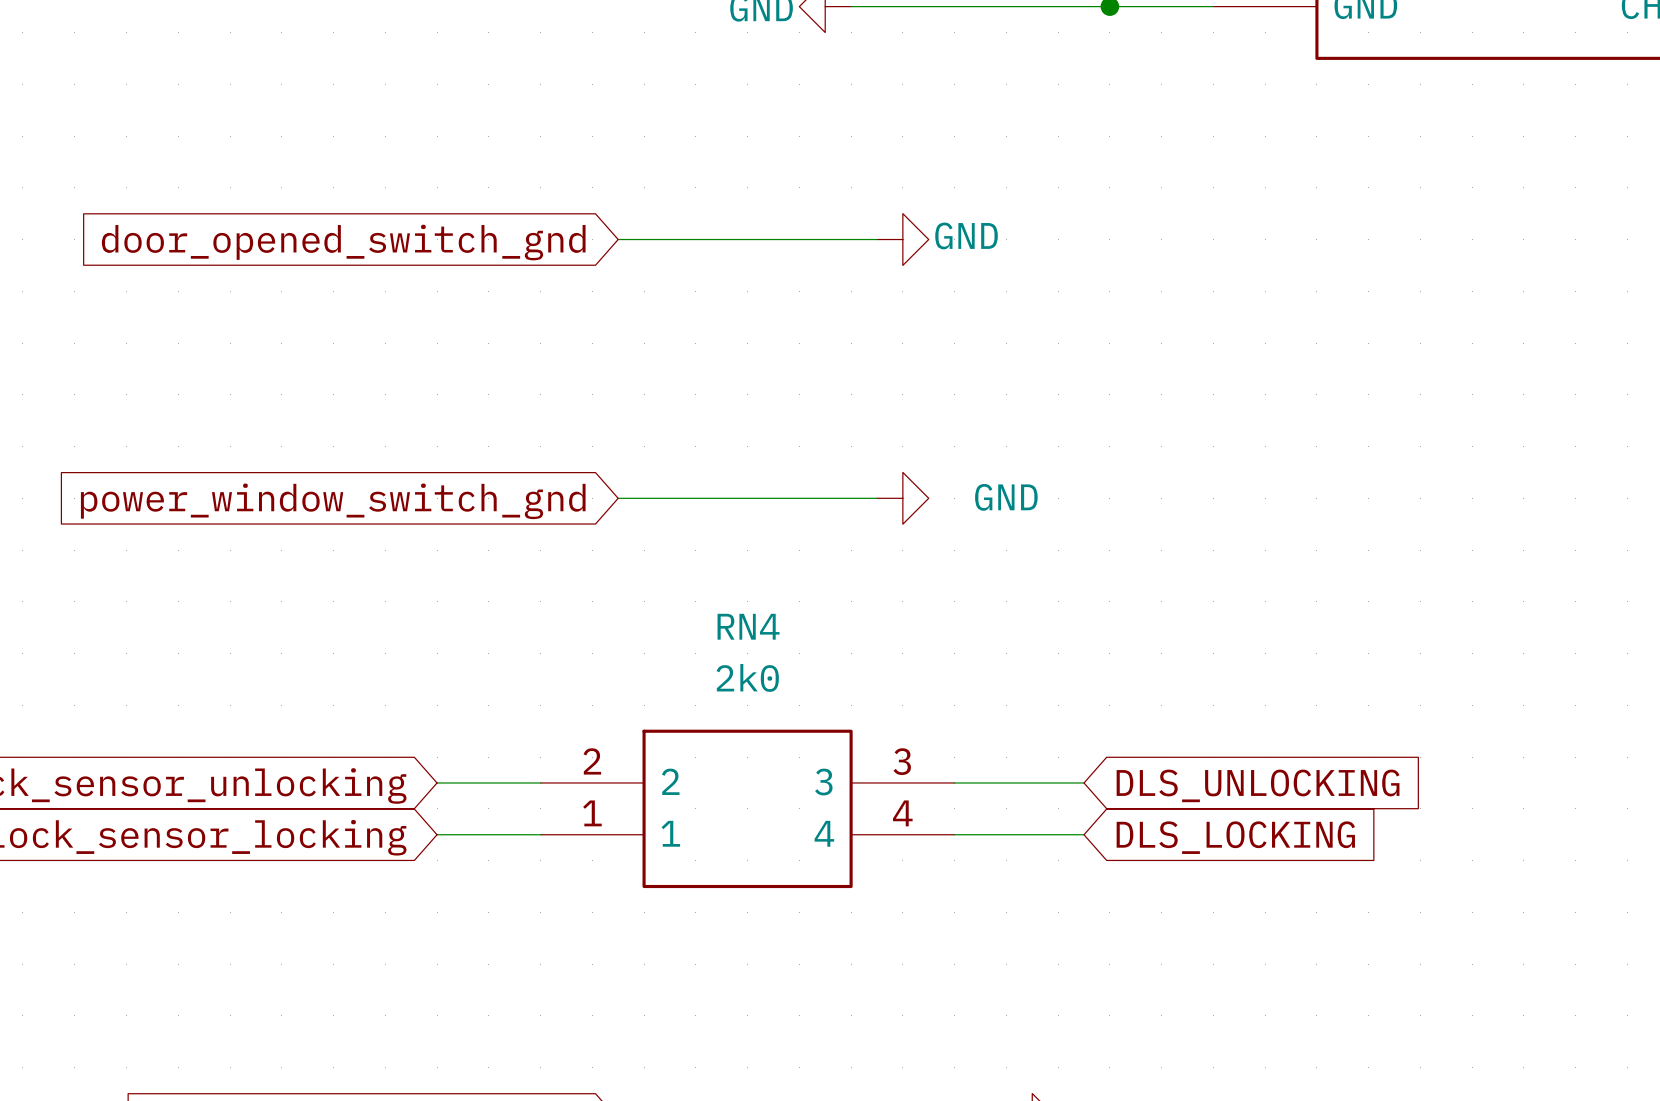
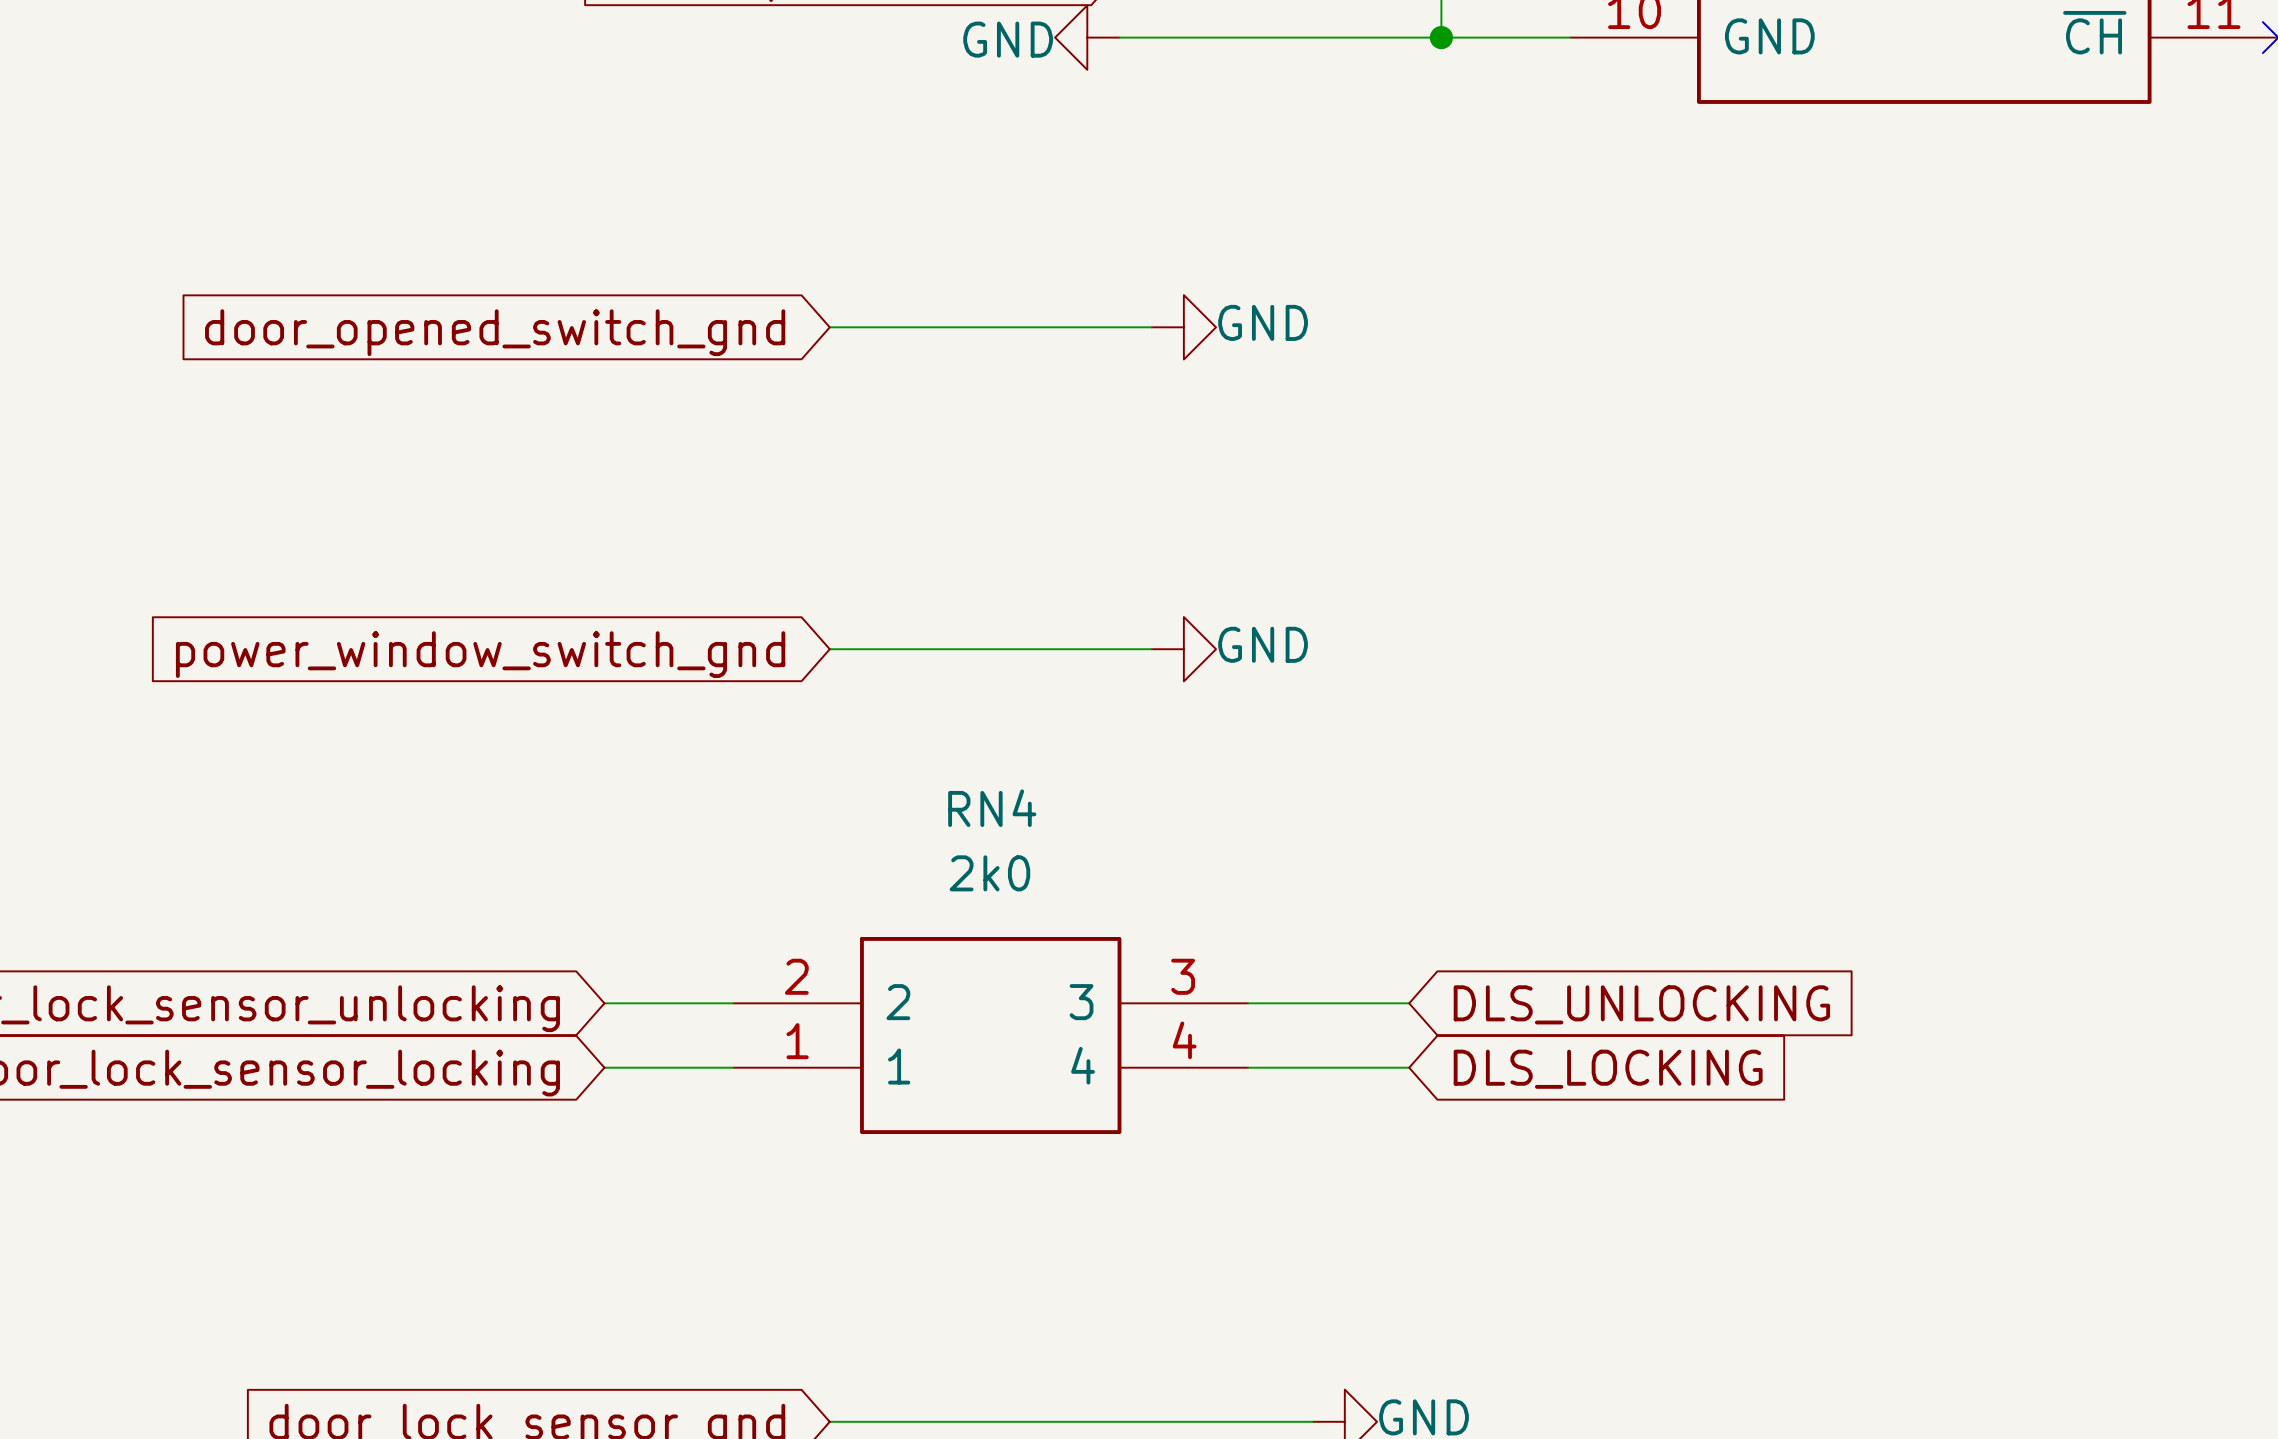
power symbol text position: GND (1006, 497) -> GND (1263, 644)

